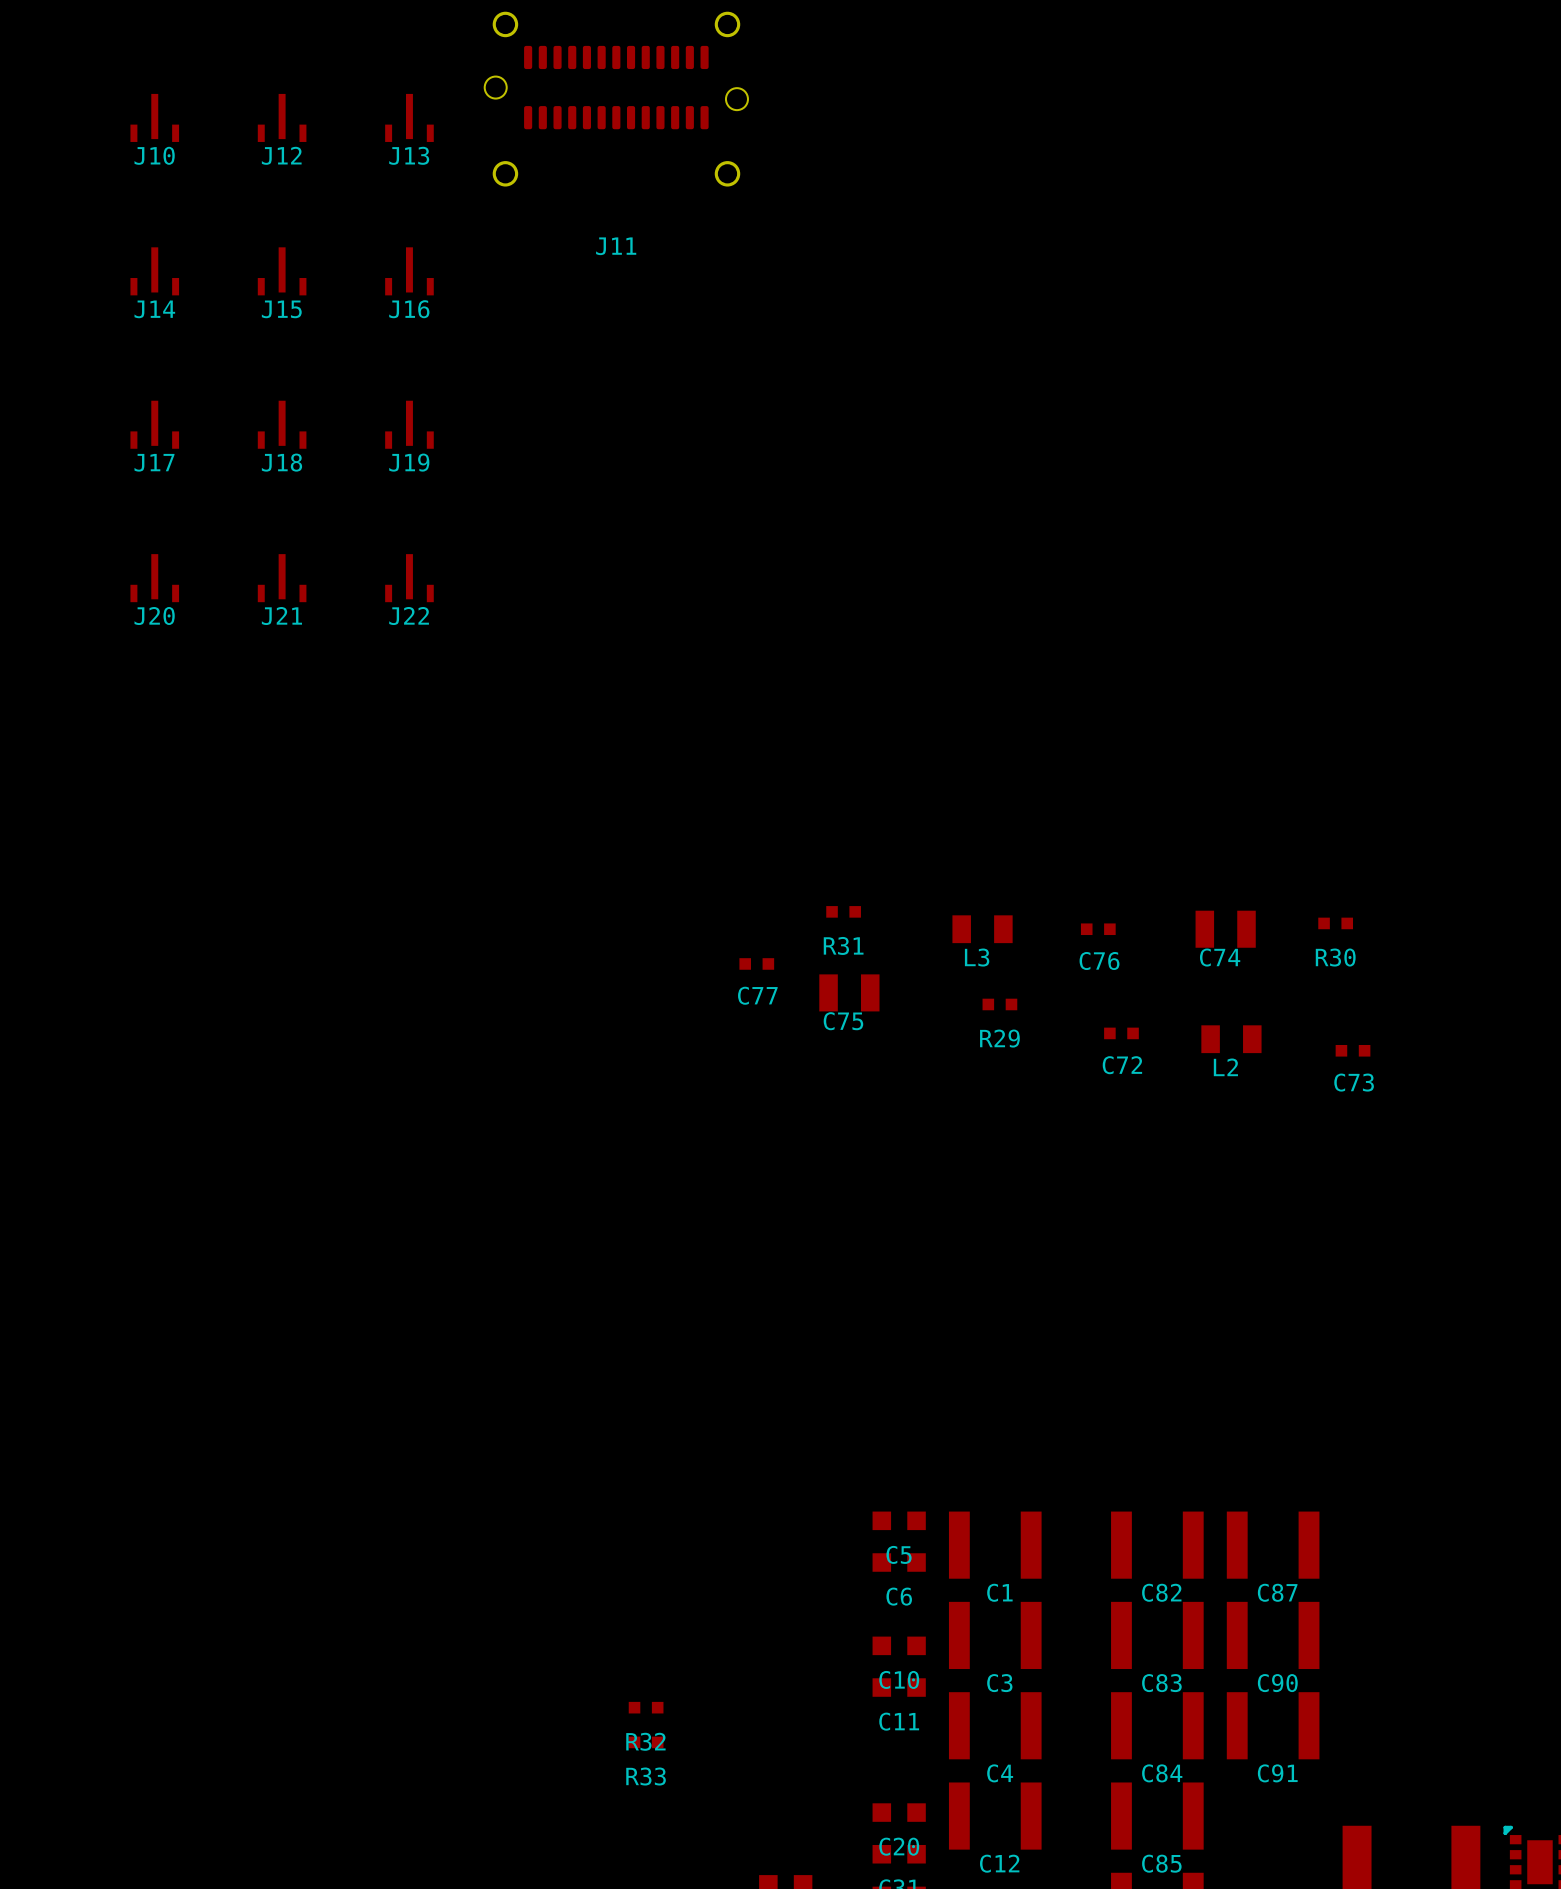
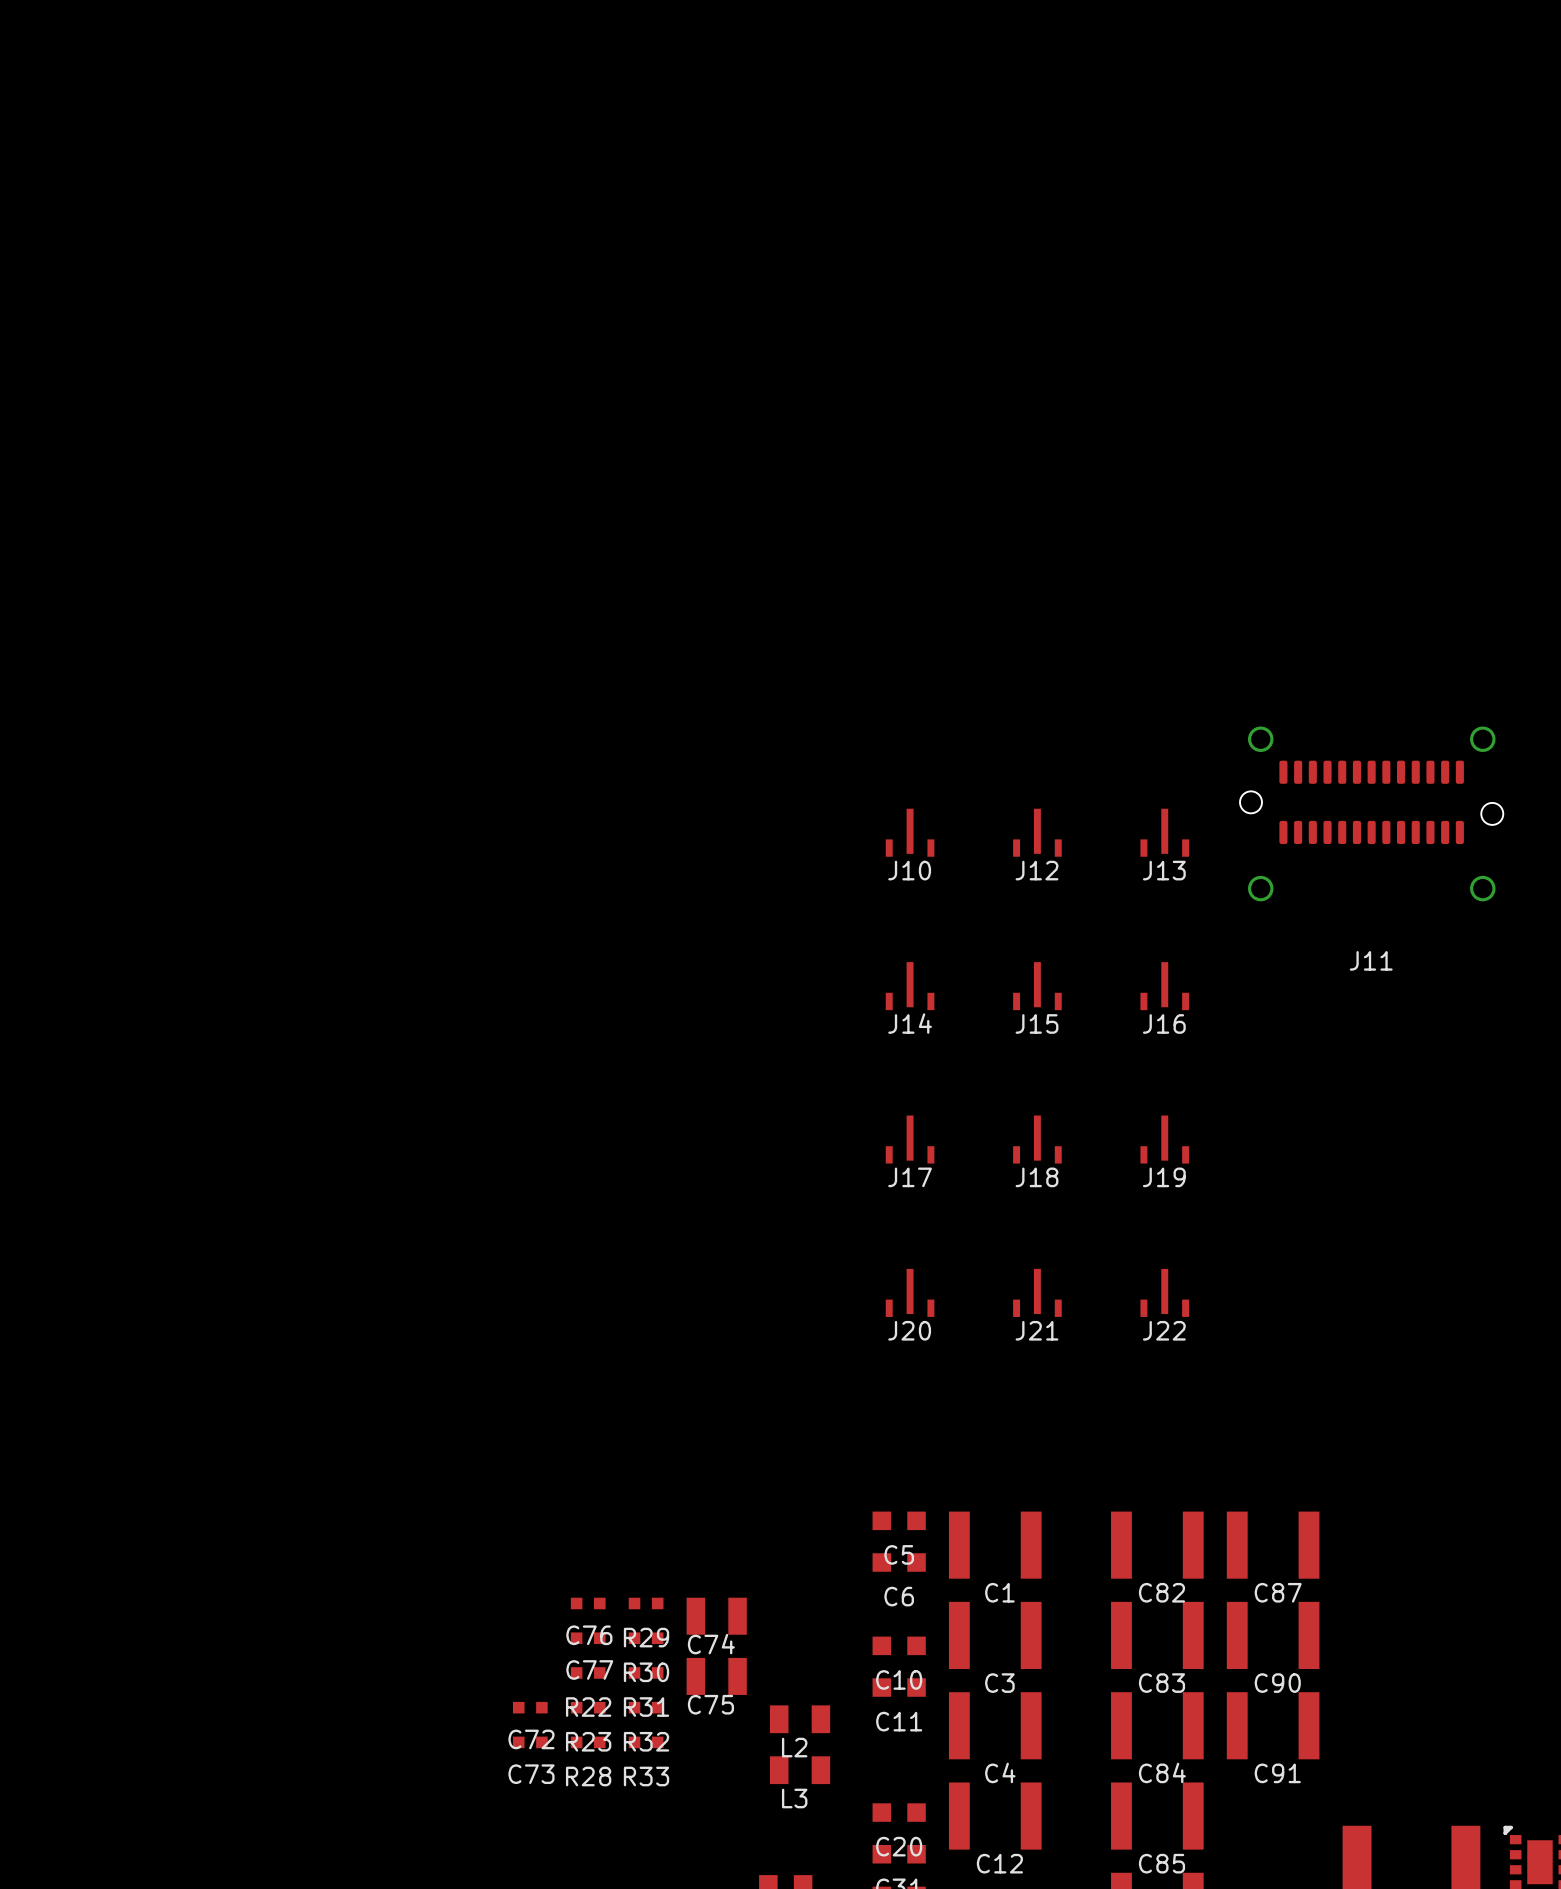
J11 position: (616, 99) -> (1371, 813)
J10 position: (154, 102) -> (910, 817)
J12 position: (282, 102) -> (1037, 817)
J13 position: (409, 102) -> (1164, 817)
J14 position: (154, 256) -> (910, 971)
J15 position: (282, 256) -> (1037, 971)
J16 position: (409, 256) -> (1164, 971)
J17 position: (154, 409) -> (910, 1124)
J18 position: (282, 409) -> (1037, 1124)
J19 position: (409, 409) -> (1164, 1124)
J20 position: (154, 563) -> (910, 1277)
J21 position: (282, 563) -> (1037, 1277)
J22 position: (409, 563) -> (1164, 1277)
R31 position: (843, 911) -> (646, 1672)
R30 position: (1335, 923) -> (646, 1638)
L3 position: (982, 929) -> (800, 1770)
C76 position: (1098, 929) -> (588, 1603)
C74 position: (1225, 929) -> (716, 1616)
C77 position: (756, 963) -> (588, 1638)
C75 position: (849, 992) -> (716, 1676)
R29 position: (999, 1004) -> (646, 1603)
C72 position: (1121, 1033) -> (530, 1707)
L2 position: (1231, 1039) -> (800, 1719)
C73 position: (1353, 1050) -> (530, 1742)
R22: none -> (588, 1672)
R23: none -> (588, 1707)
R28: none -> (588, 1742)

